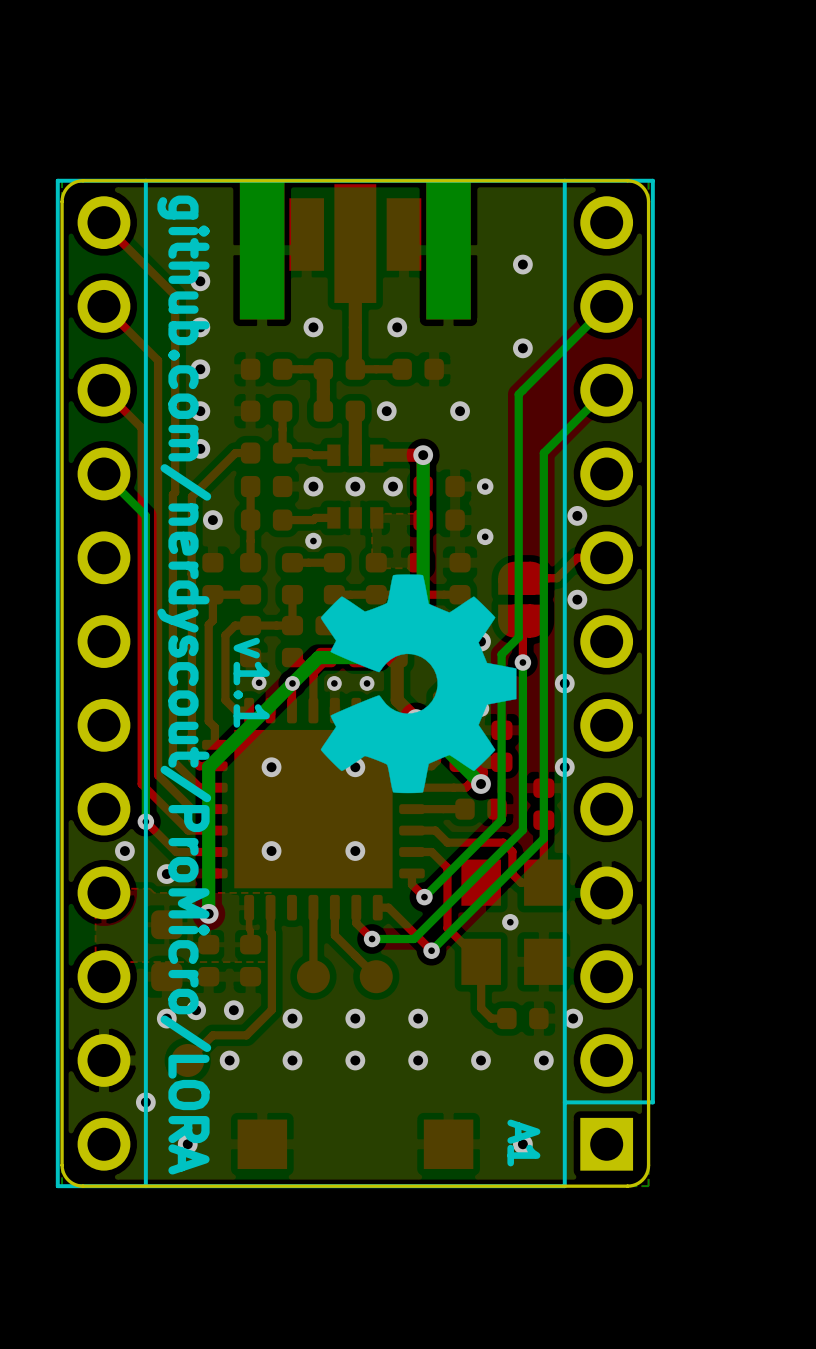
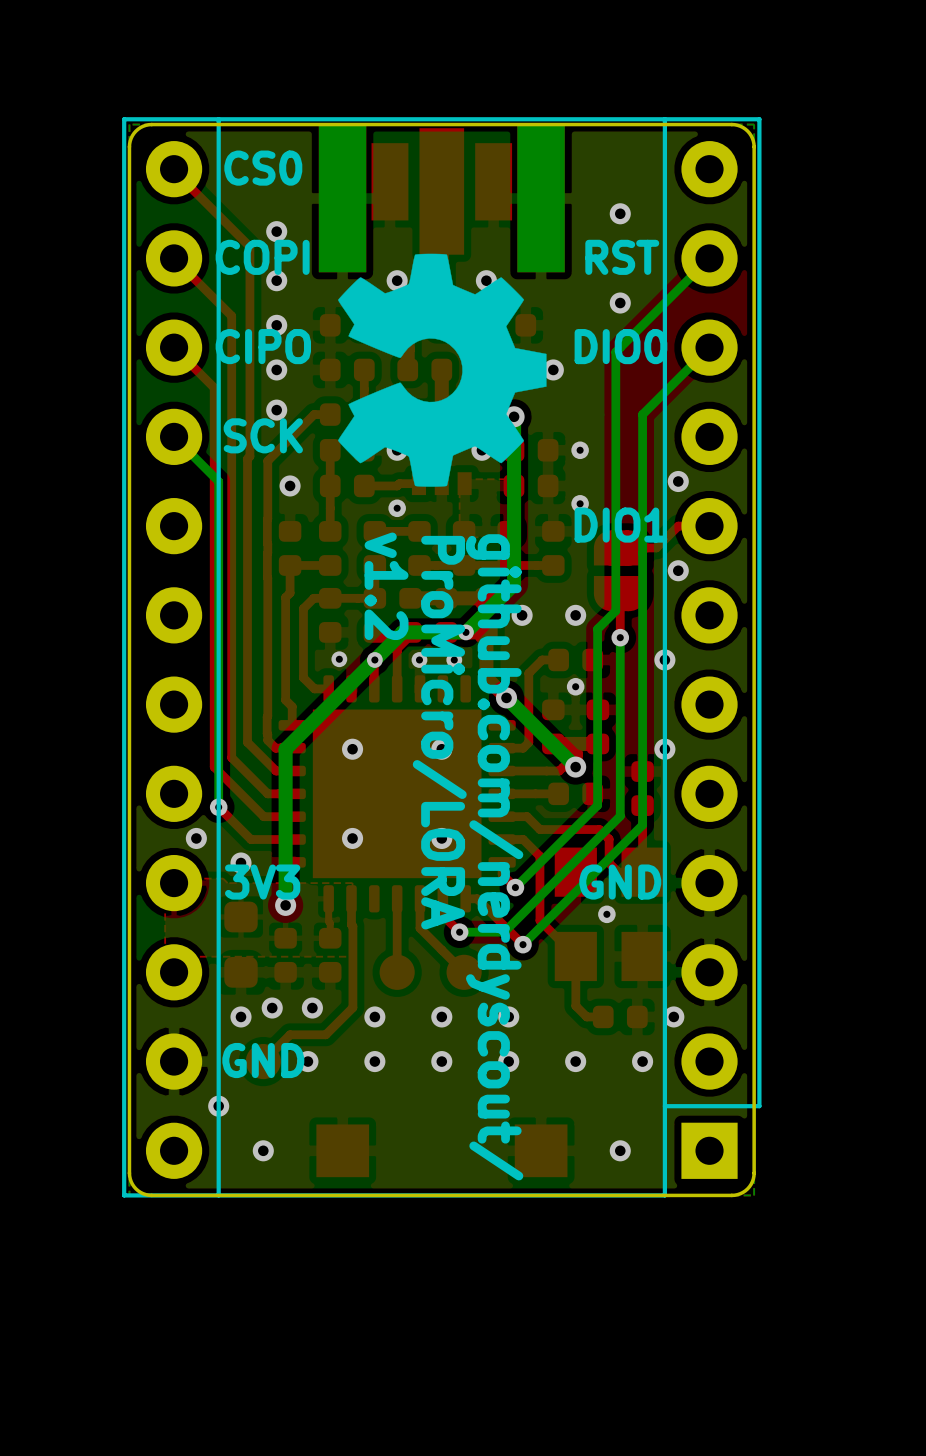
text: none -> CS0 (263, 168)
text: none -> COPI (262, 257)
text: none -> RST (622, 257)
text: none -> CIPO (263, 346)
text: none -> DIO0 (620, 346)
text: none -> SCK (263, 435)
text: none -> DIO1 (620, 525)
part: none -> (441, 657)
text: v1.1 (251, 682) -> v1.2 (386, 586)
A1: (355, 683) -> none
drawing position: (418, 683) -> (442, 370)
text: github.com/nerdyscout/ProMicro/LORA (184, 685) -> none
text: none -> ProMicro/LORA (439, 732)
text: none -> github.com/nerdyscout/ (494, 857)
text: none -> 3V3 (262, 882)
text: none -> GND (620, 882)
text: none -> GND (263, 1060)

